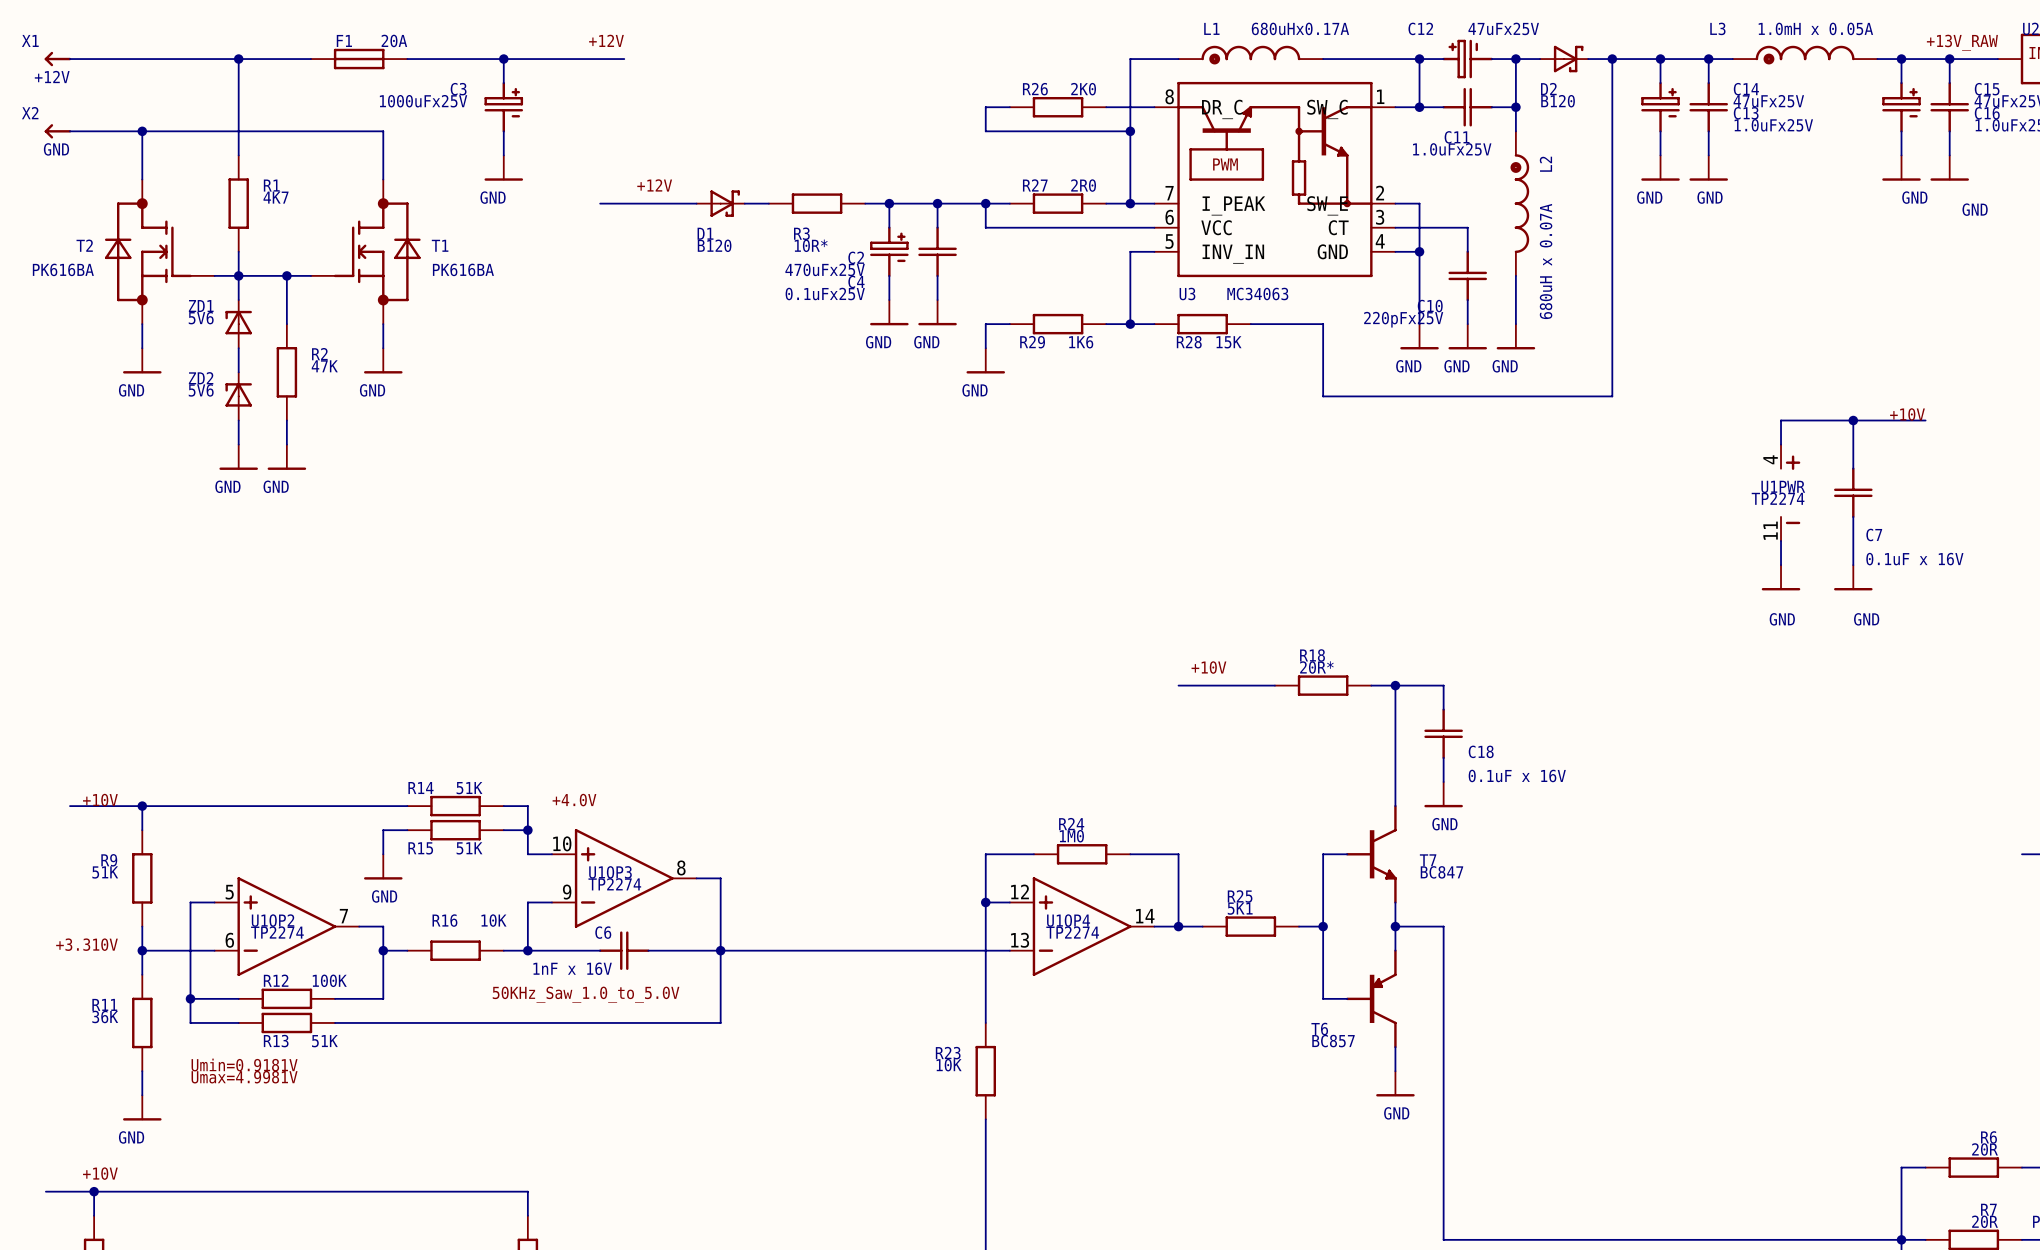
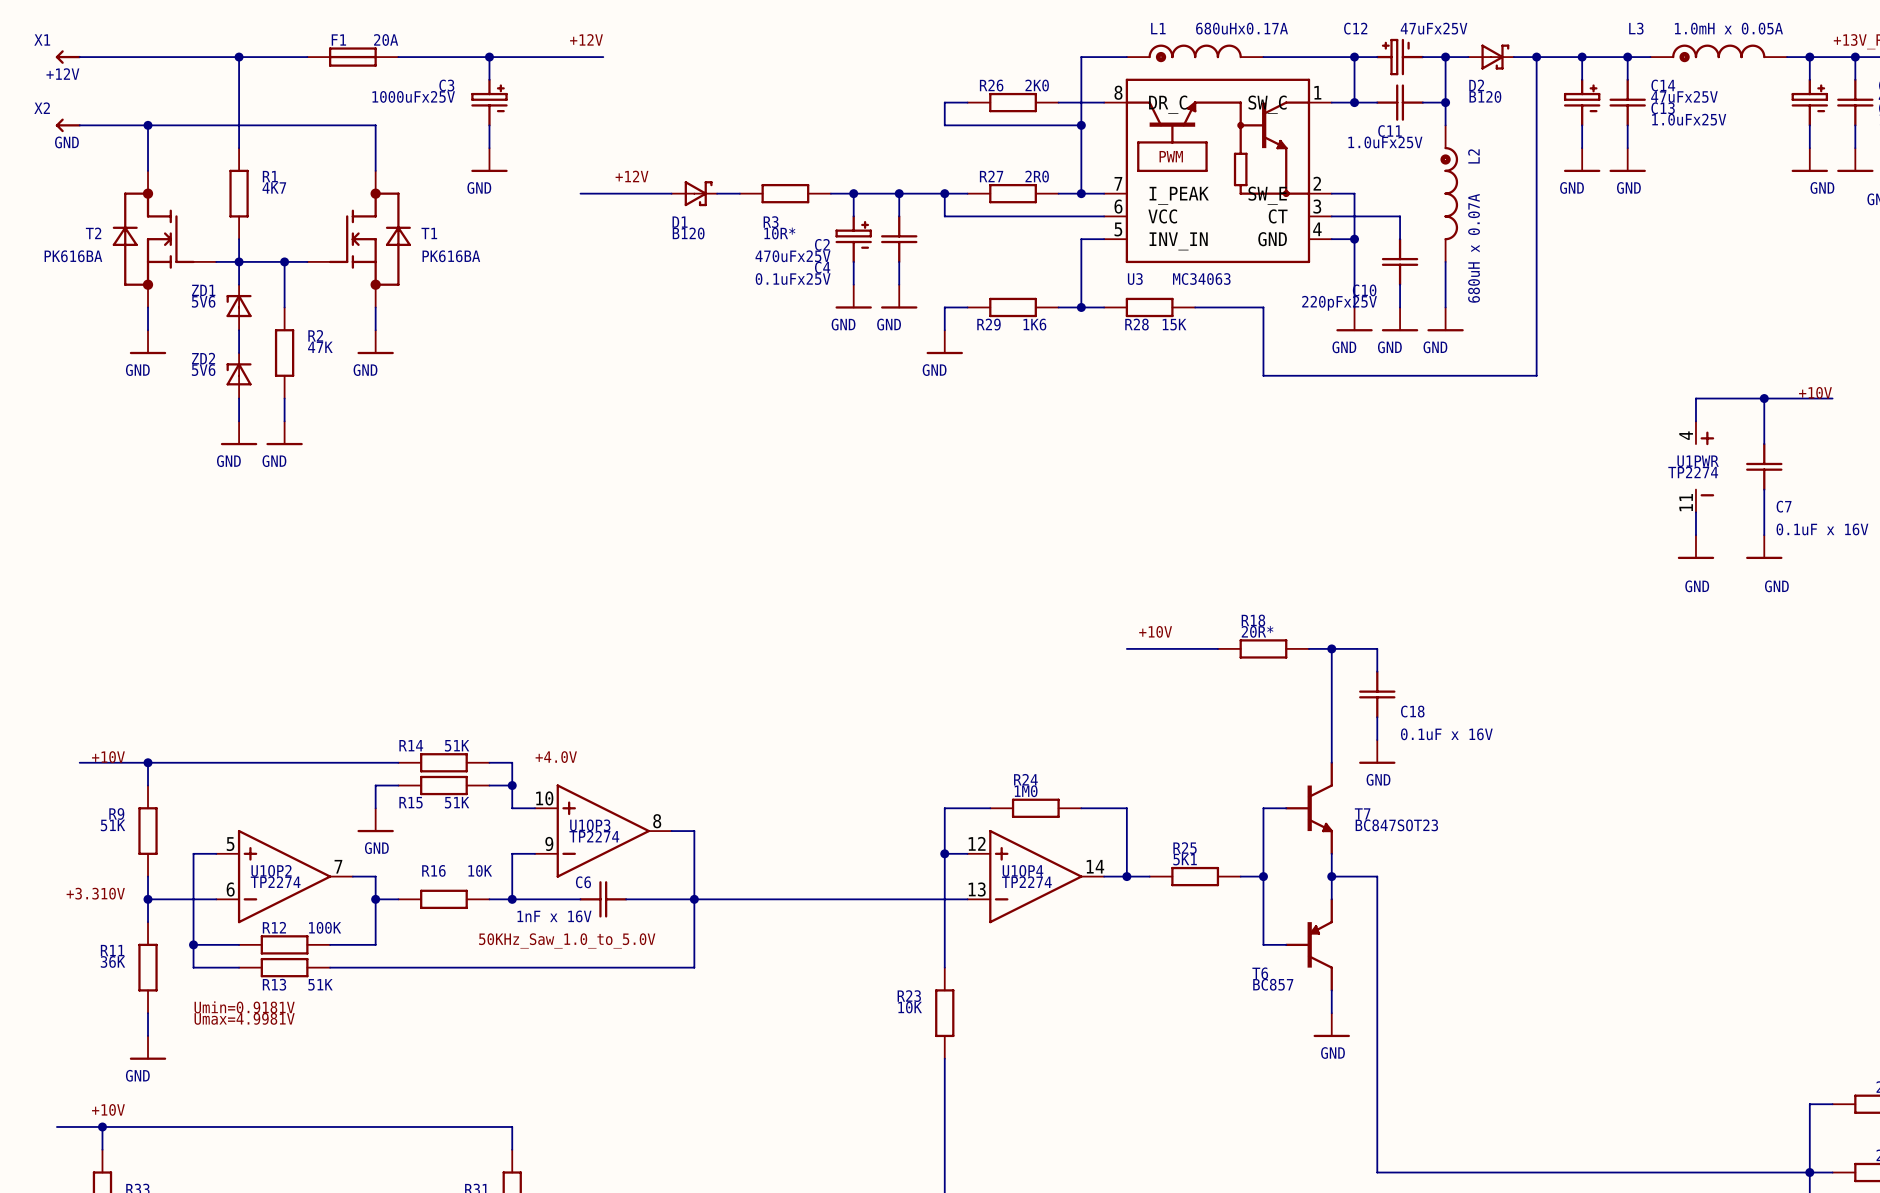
T7 value: BC847 (1441, 872) -> BC847SOT23 (1396, 825)

